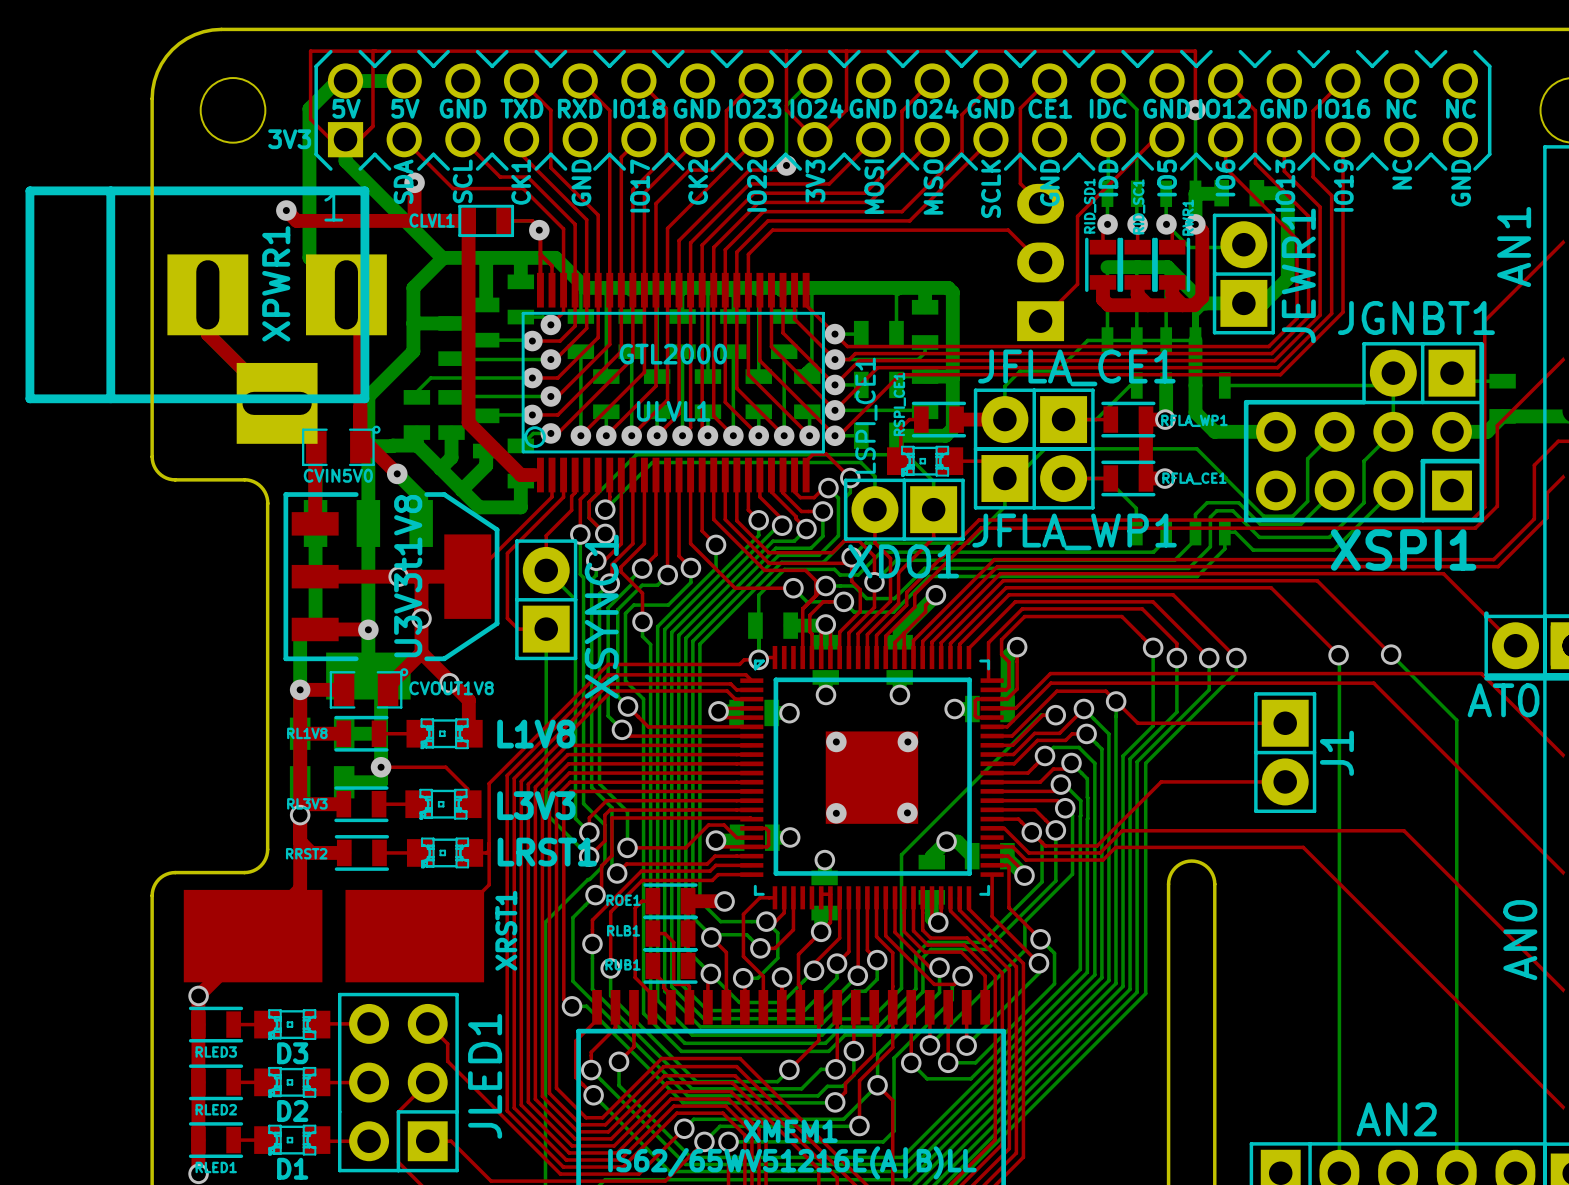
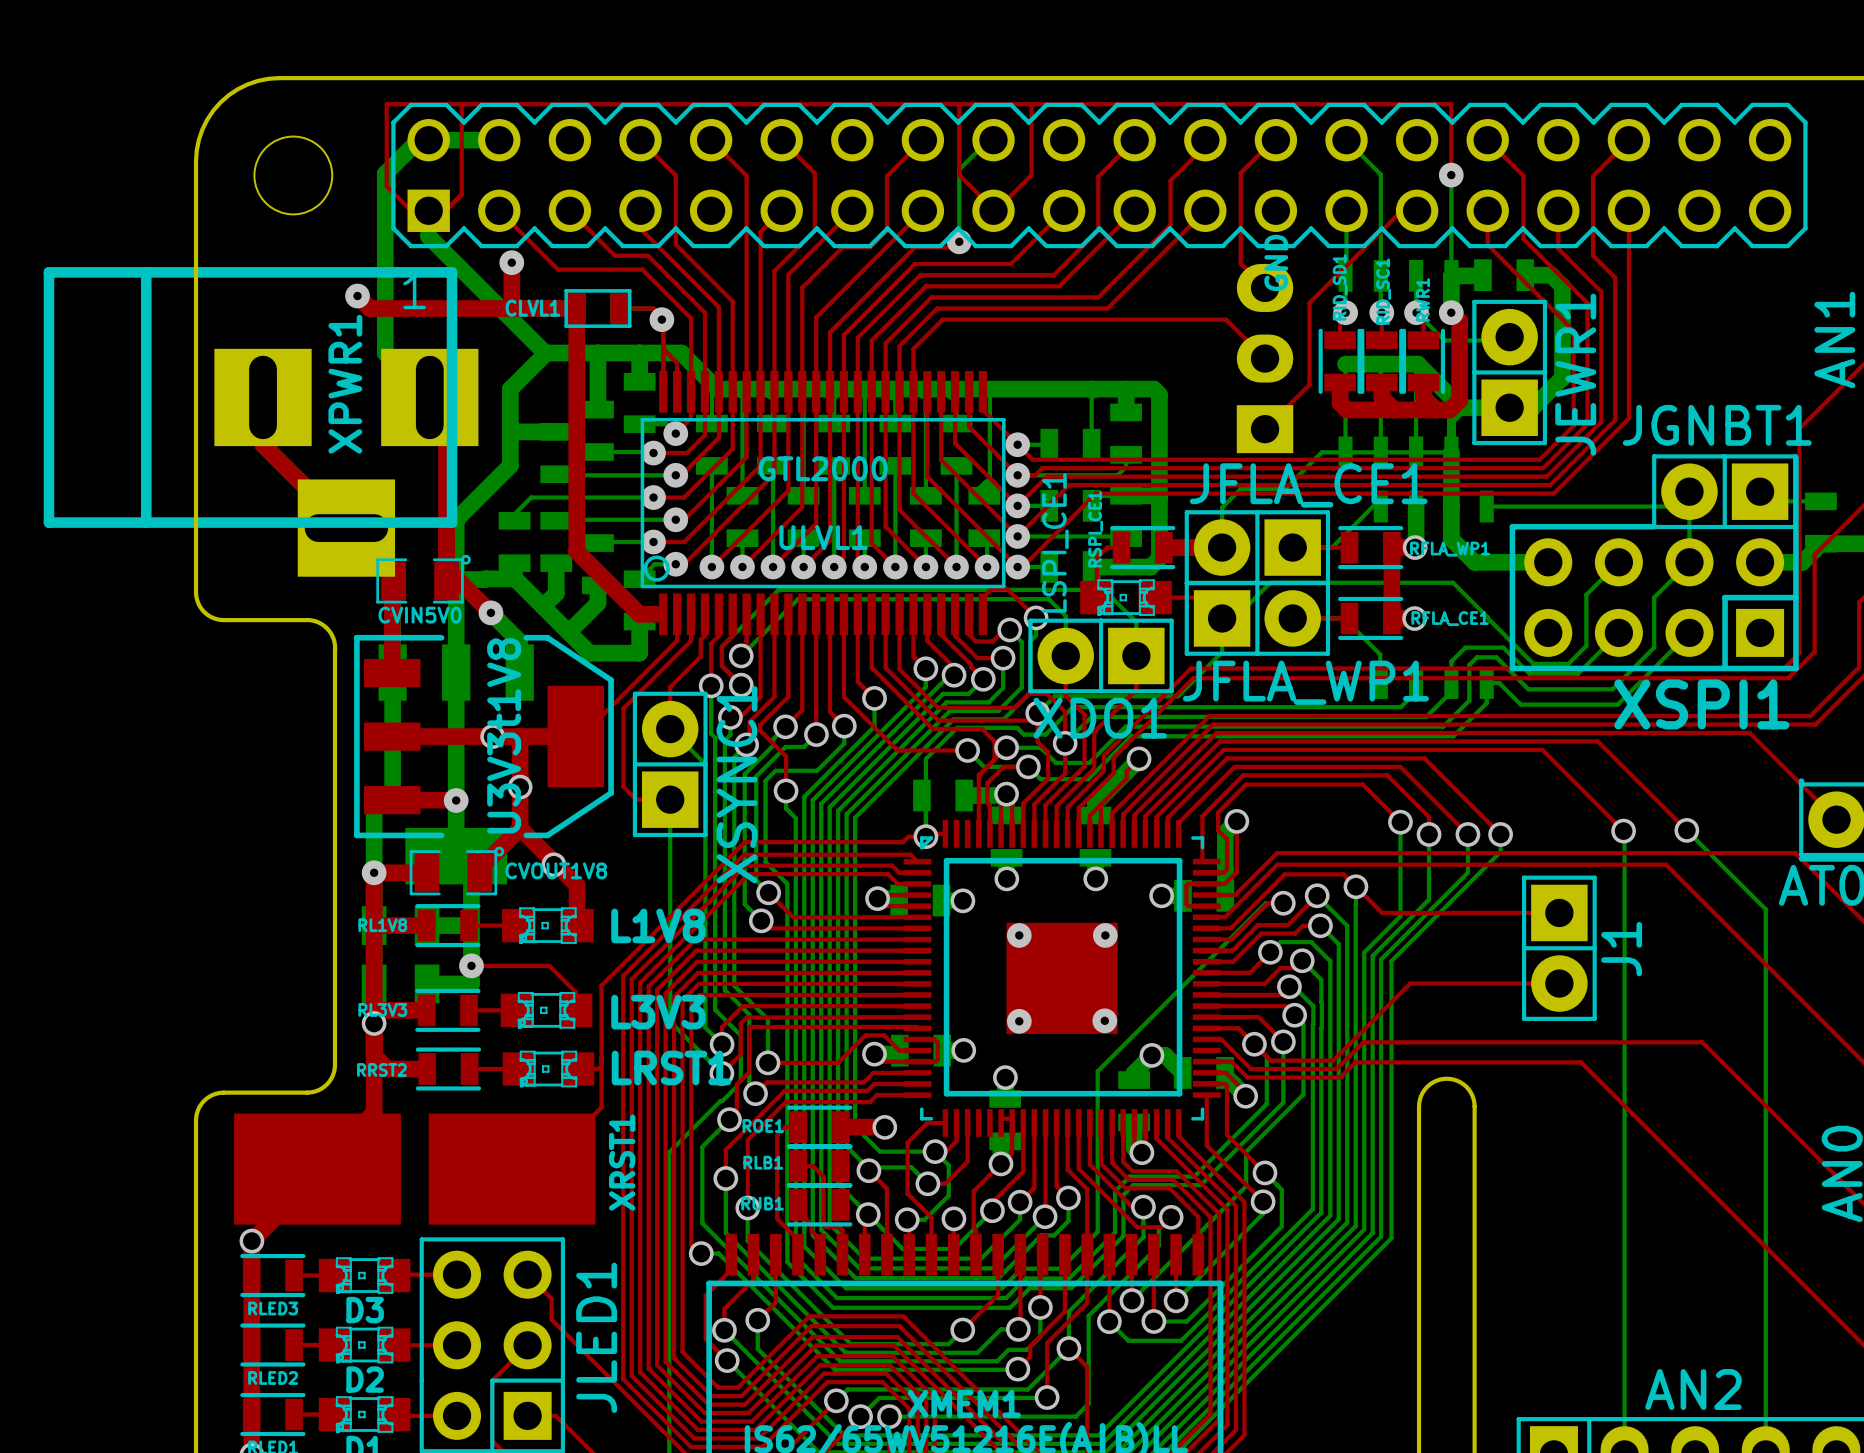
part footprint: [314, 49, 1492, 171] -> [391, 102, 1808, 249]
text: 5V (346, 108) -> none
text: 5V (405, 108) -> none
text: GND (463, 108) -> none
text: TXD (521, 108) -> none
text: RXD (580, 108) -> none
text: IO18 (639, 108) -> none
text: GND (697, 108) -> none
text: IO23 (755, 108) -> none
text: IO24 (817, 108) -> none
text: GND (872, 108) -> none
text: IO24 (932, 108) -> none
text: GND (990, 108) -> none
text: CE1 (1050, 108) -> none
text: IDC (1108, 108) -> none
text: GND (1166, 108) -> none
text: IO12 (1224, 108) -> none
text: GND (1283, 108) -> none
text: IO16 (1344, 108) -> none
text: NC (1401, 108) -> none
text: NC (1460, 108) -> none
text: 3V3 (289, 139) -> none
text: NC (1402, 174) -> none
text: IDD (1108, 178) -> none
text: IO5 (1167, 178) -> none
text: IO6 (1225, 178) -> none
text: SDA (403, 181) -> none
text: SCL (462, 181) -> none
text: 3V3 (815, 181) -> none
text: CK1 (521, 182) -> none
text: GND (581, 182) -> none
text: CK2 (698, 182) -> none
text: GND (1461, 183) -> none
text: IO17 (640, 185) -> none
text: IO22 (757, 185) -> none
text: IO13 (1285, 185) -> none
text: IO19 (1343, 185) -> none
text: MOSI (874, 186) -> none
text: MISO (933, 187) -> none
text: SCLK (991, 188) -> none
RID_SD1 name position: RID_SD1 (1090, 206) -> RID_SD1 (1340, 287)
RWR1 name position: RWR1 (1188, 217) -> RWR1 (1423, 299)

